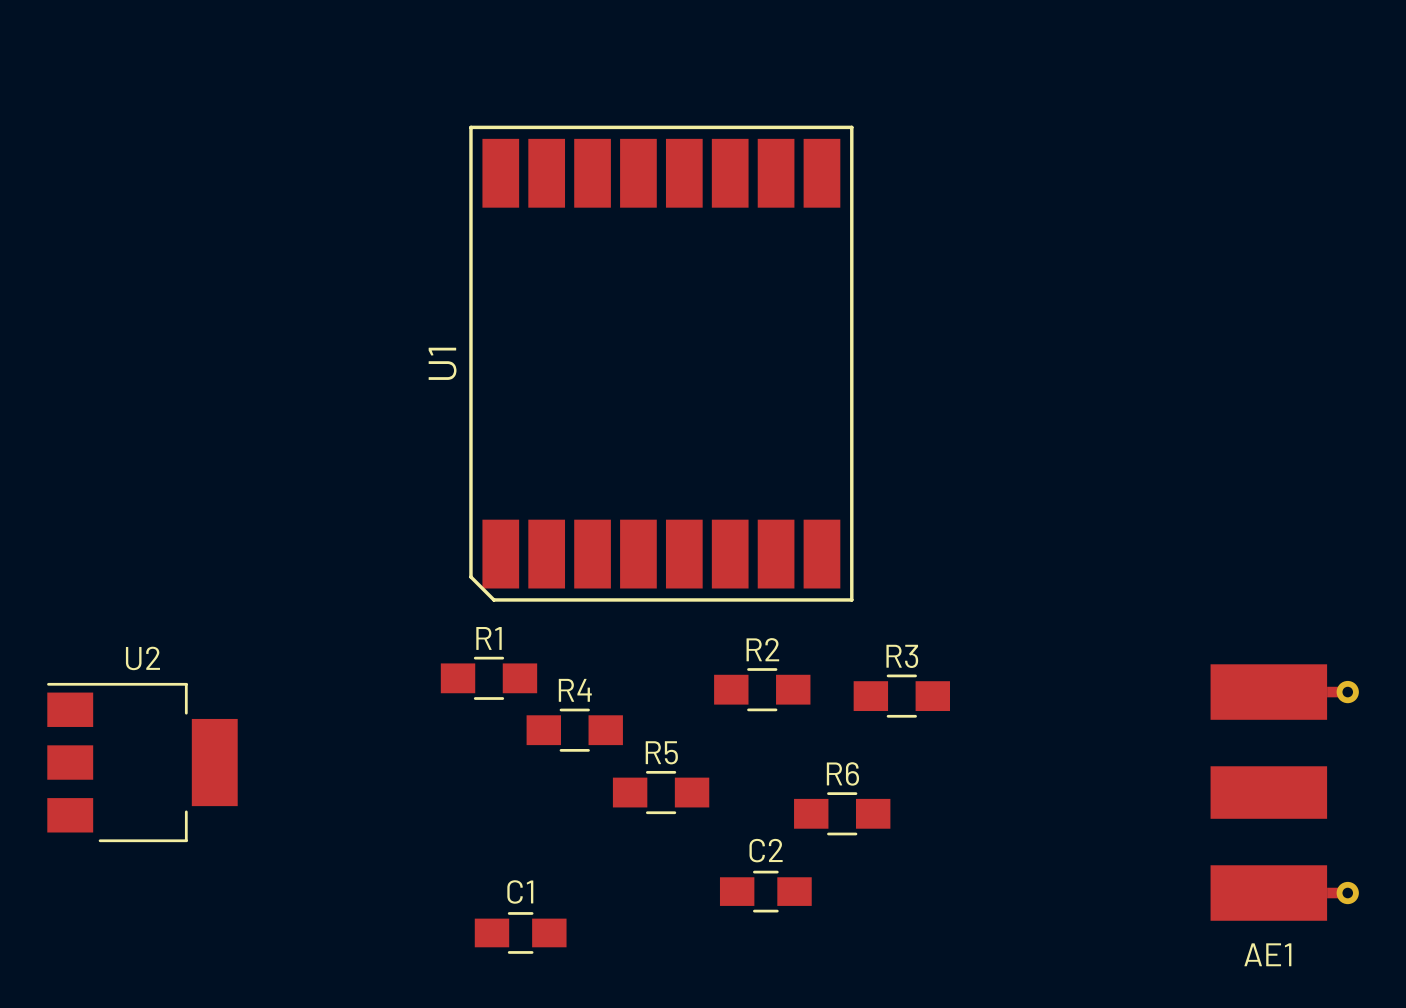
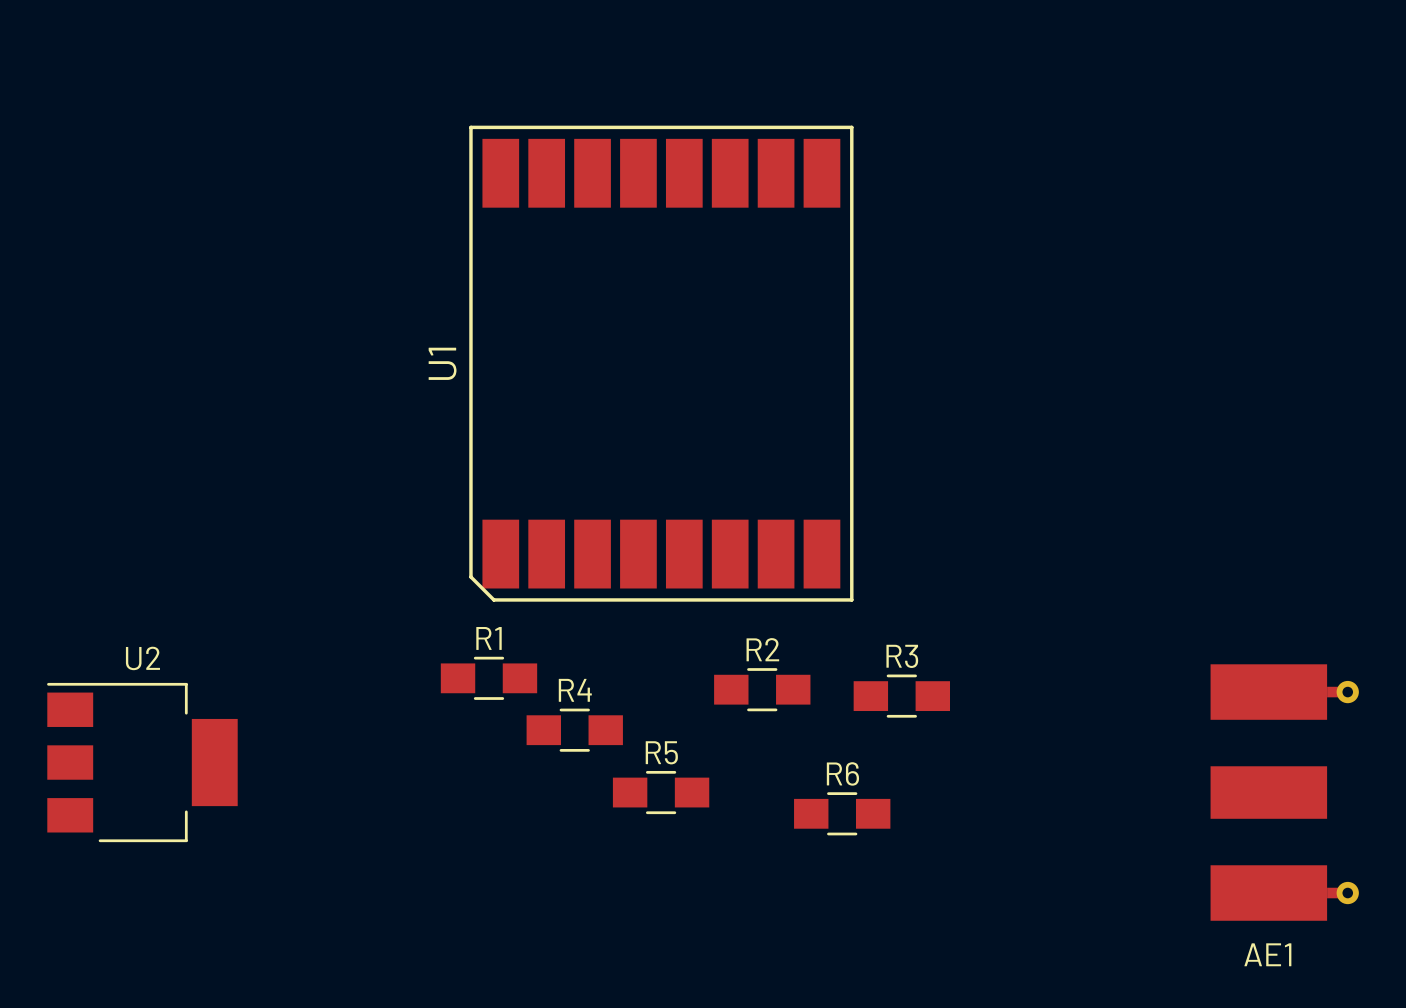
C2: (765, 891) -> none
C1: (520, 932) -> none

